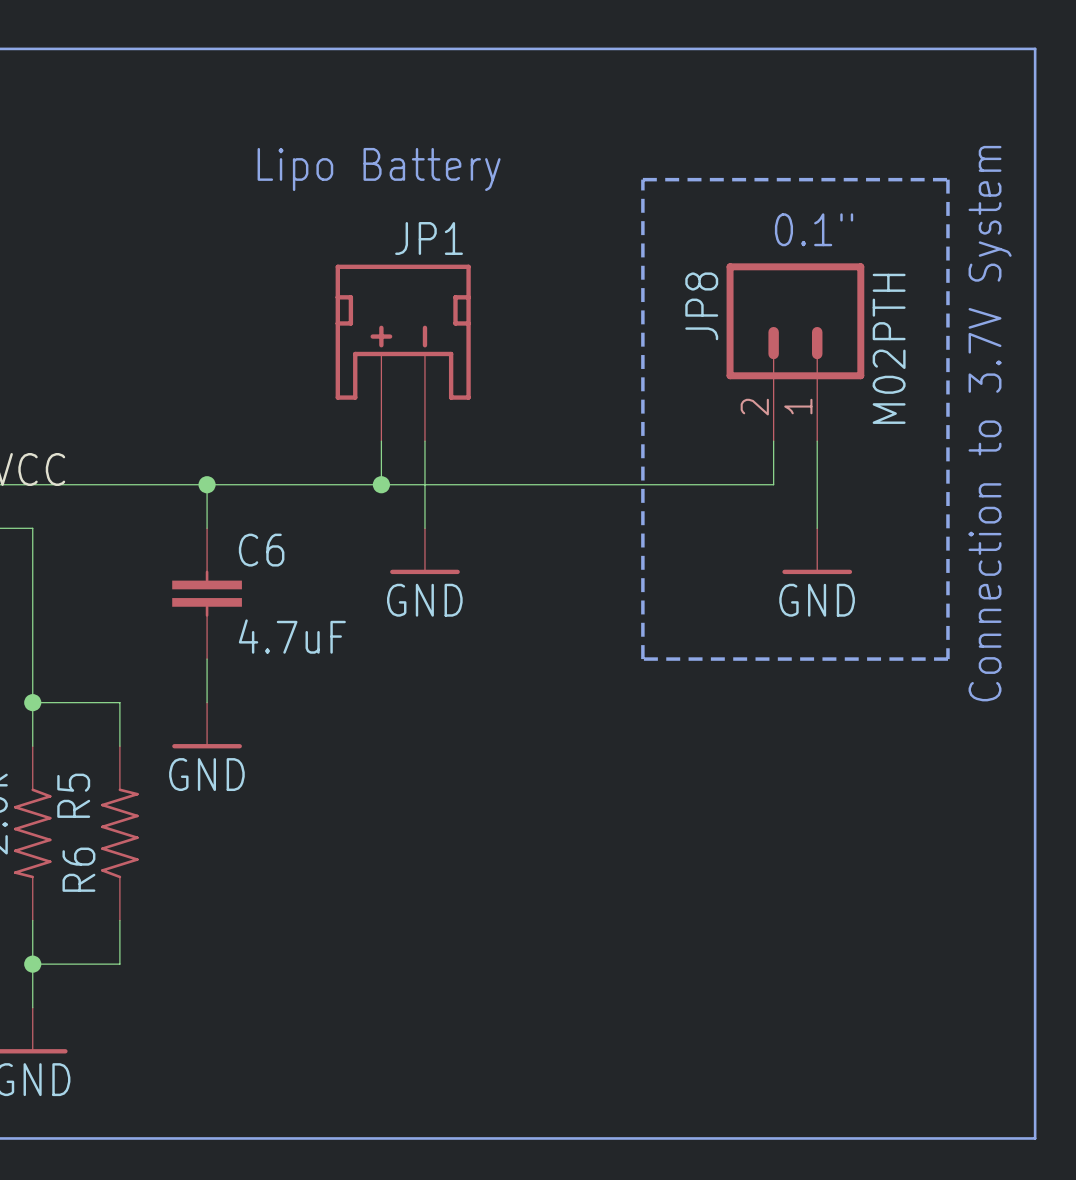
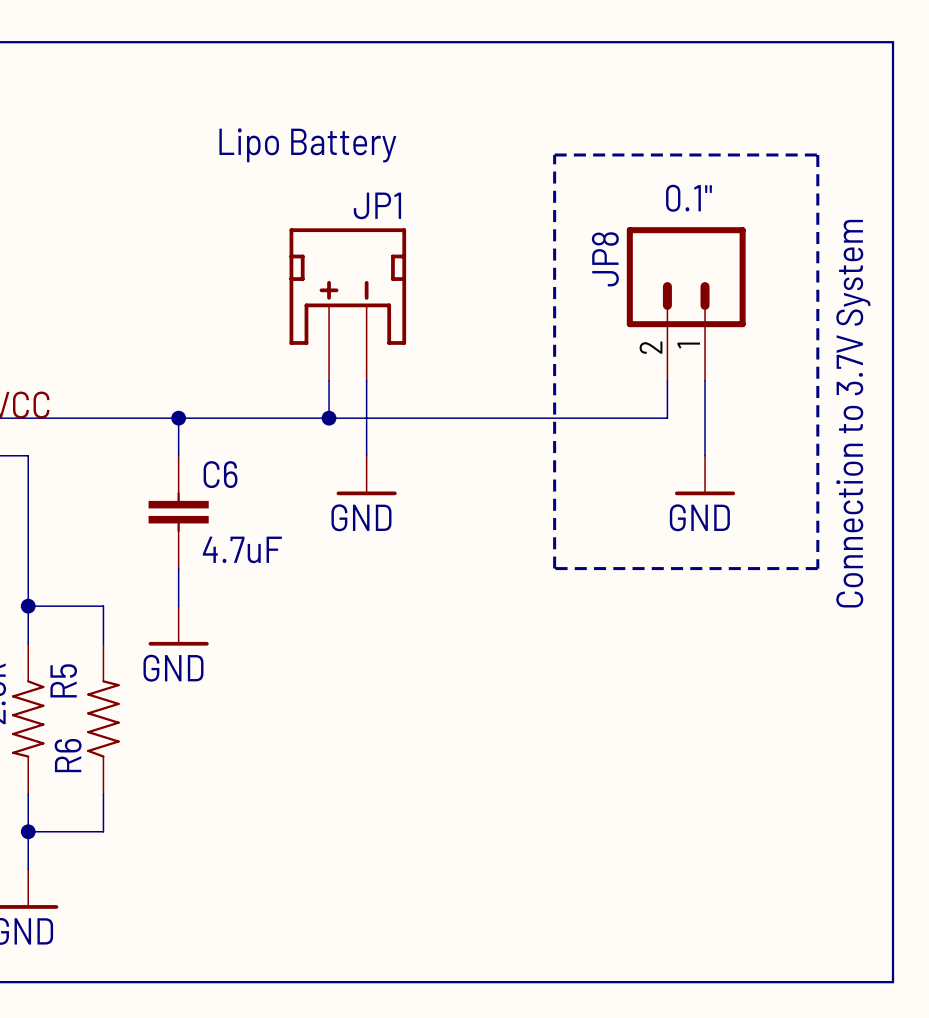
JP8 value: M02PTH (889, 348) -> none

